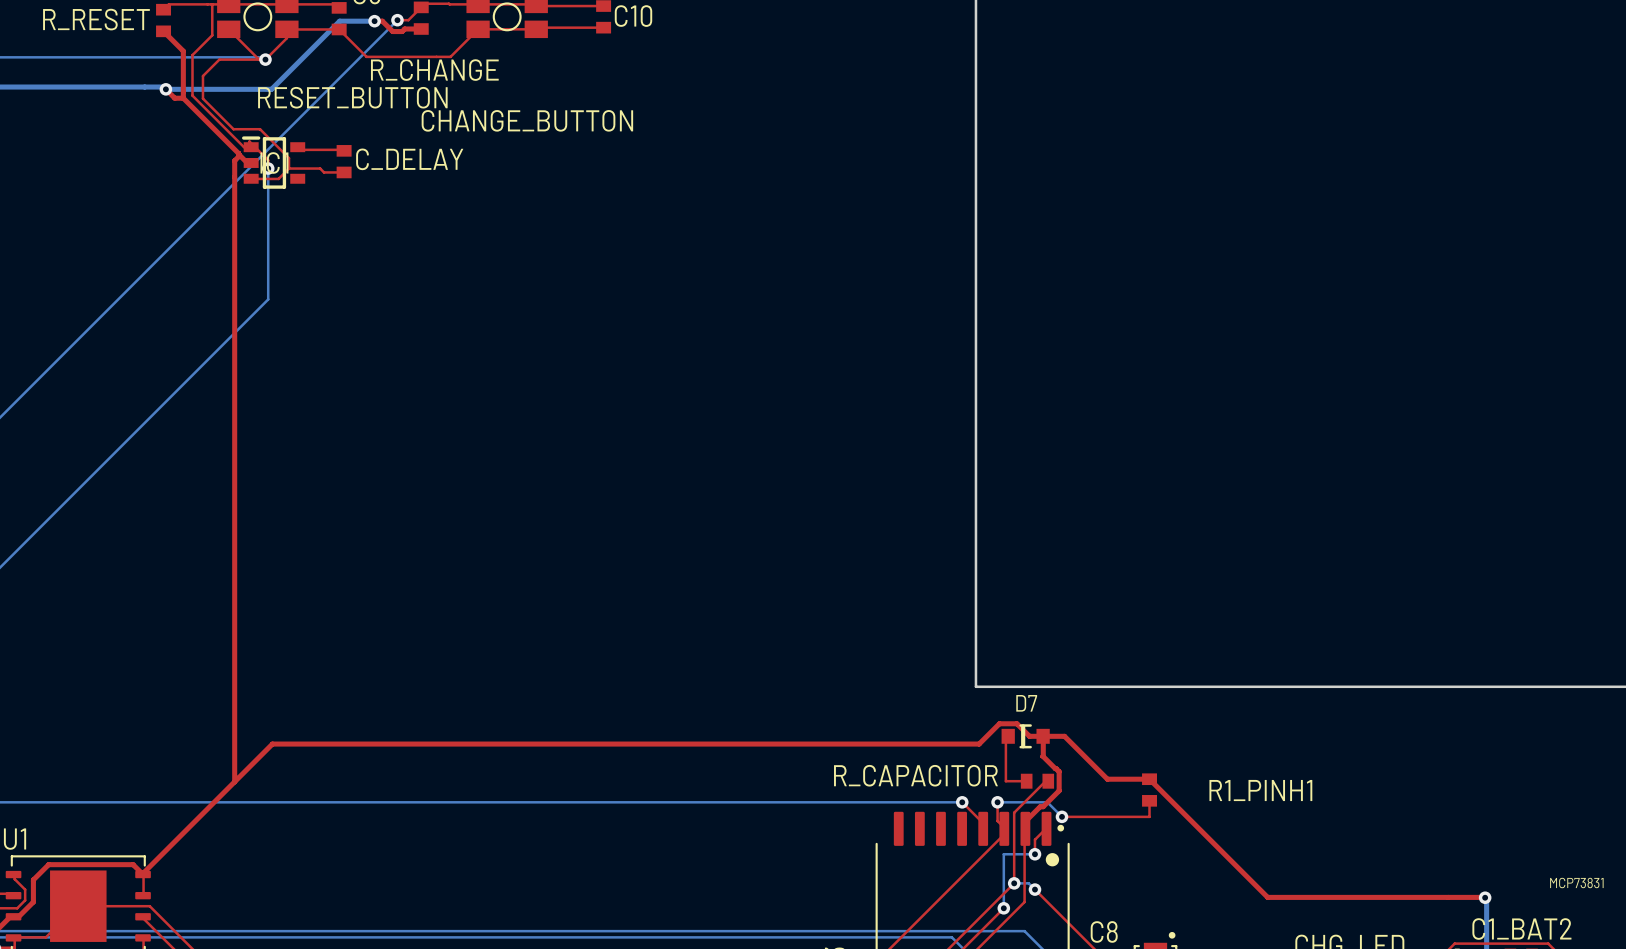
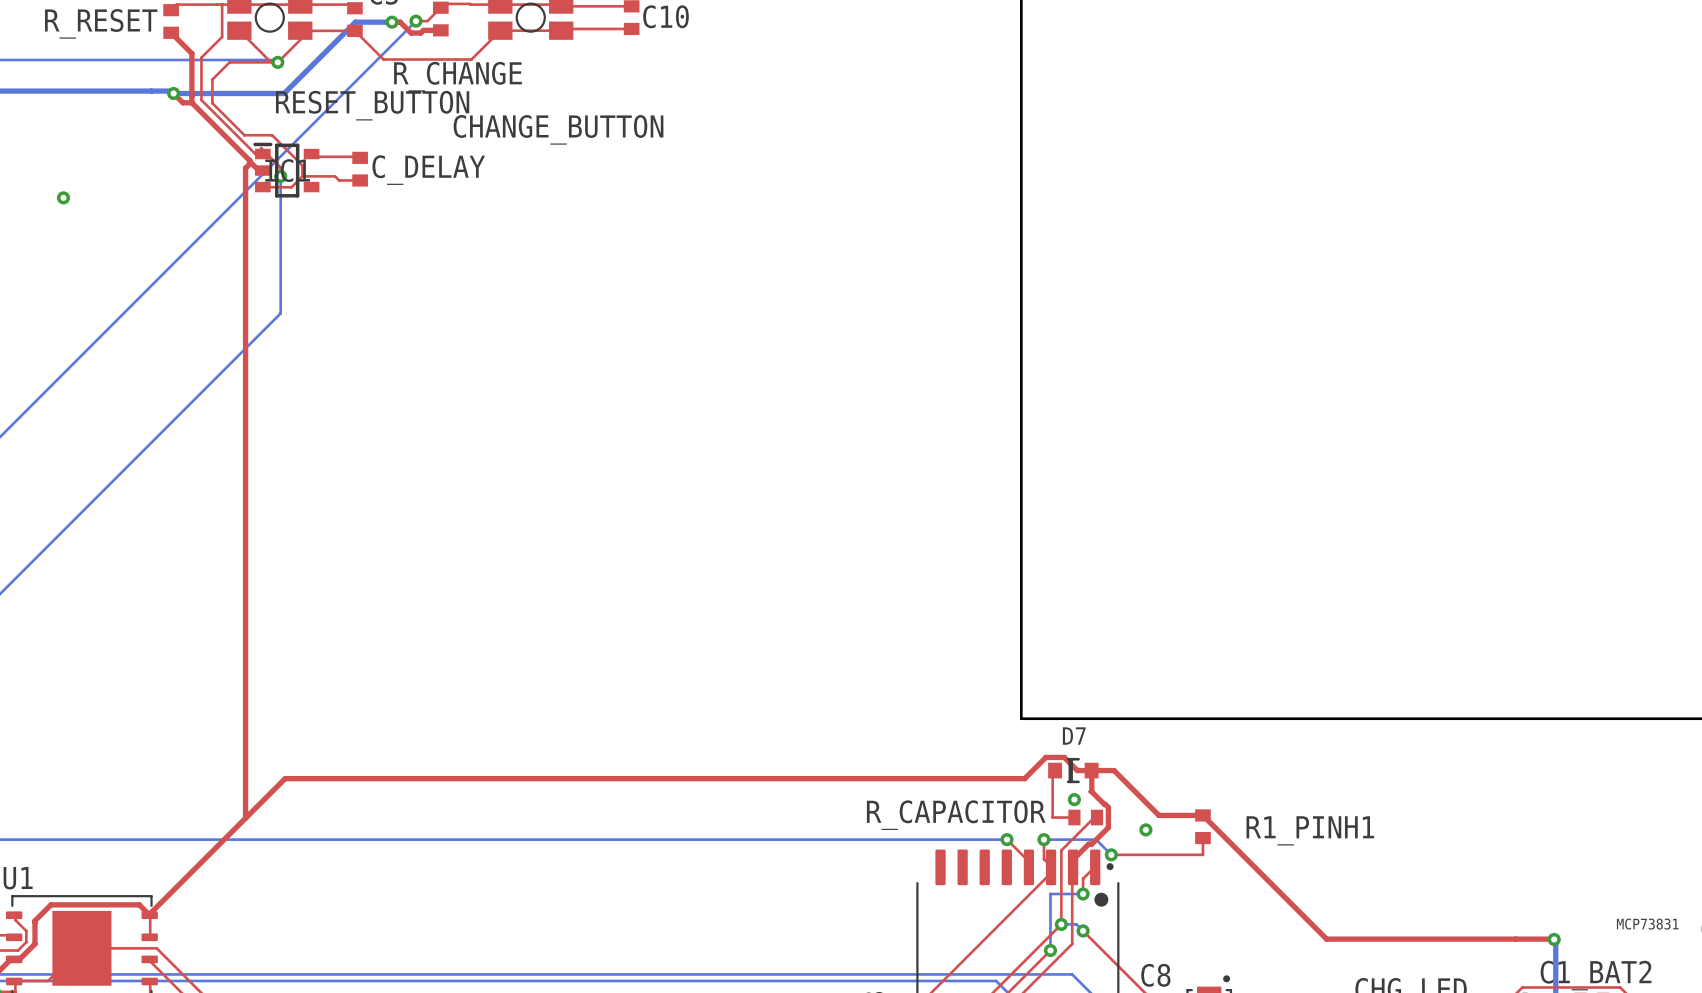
via: none -> (63, 197)
via: none -> (1074, 799)
via: none -> (1145, 829)

